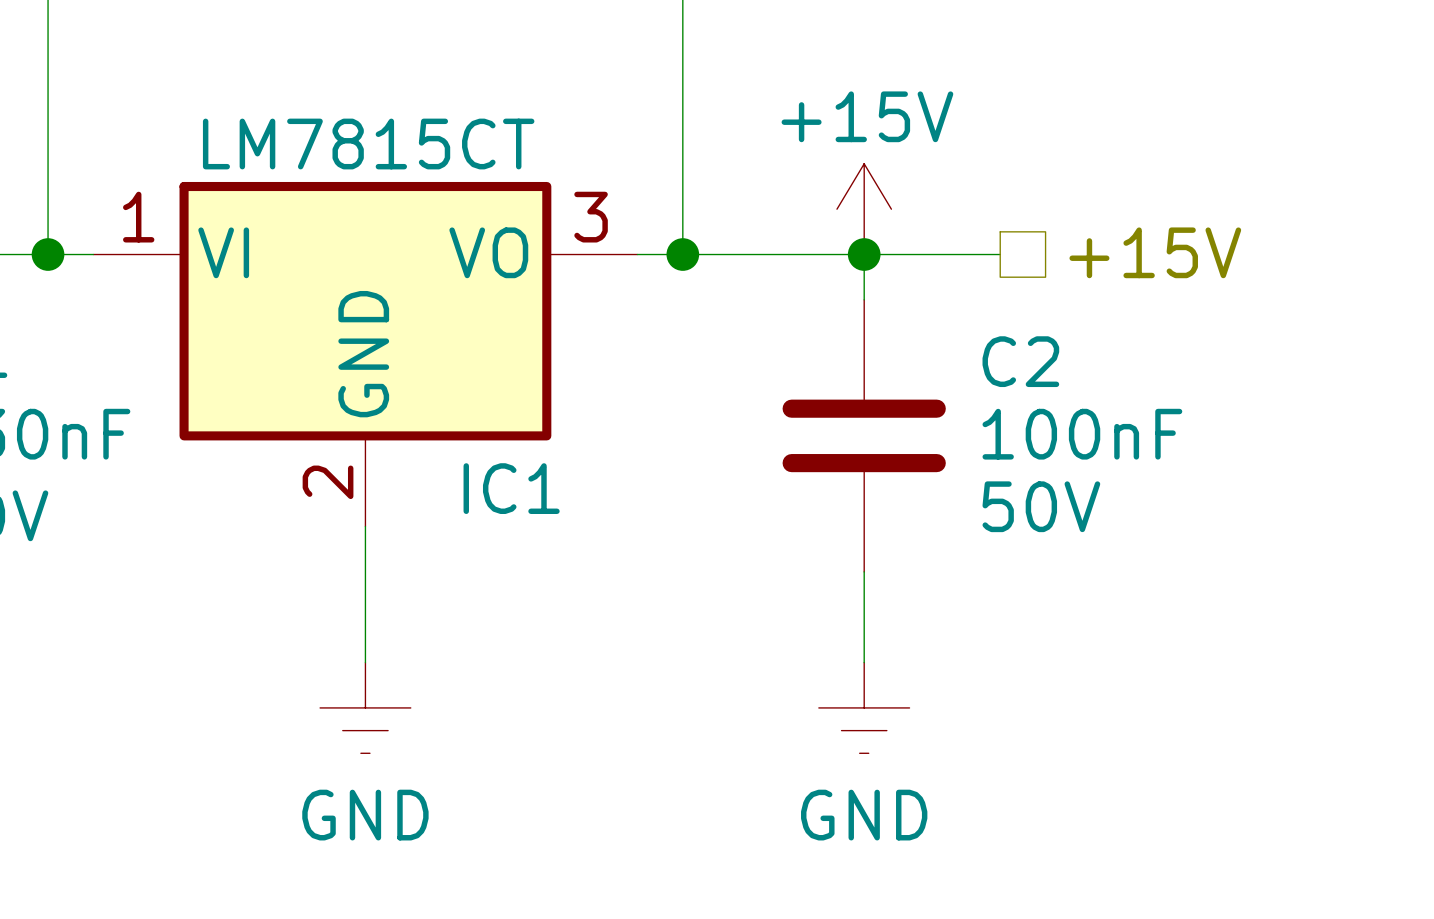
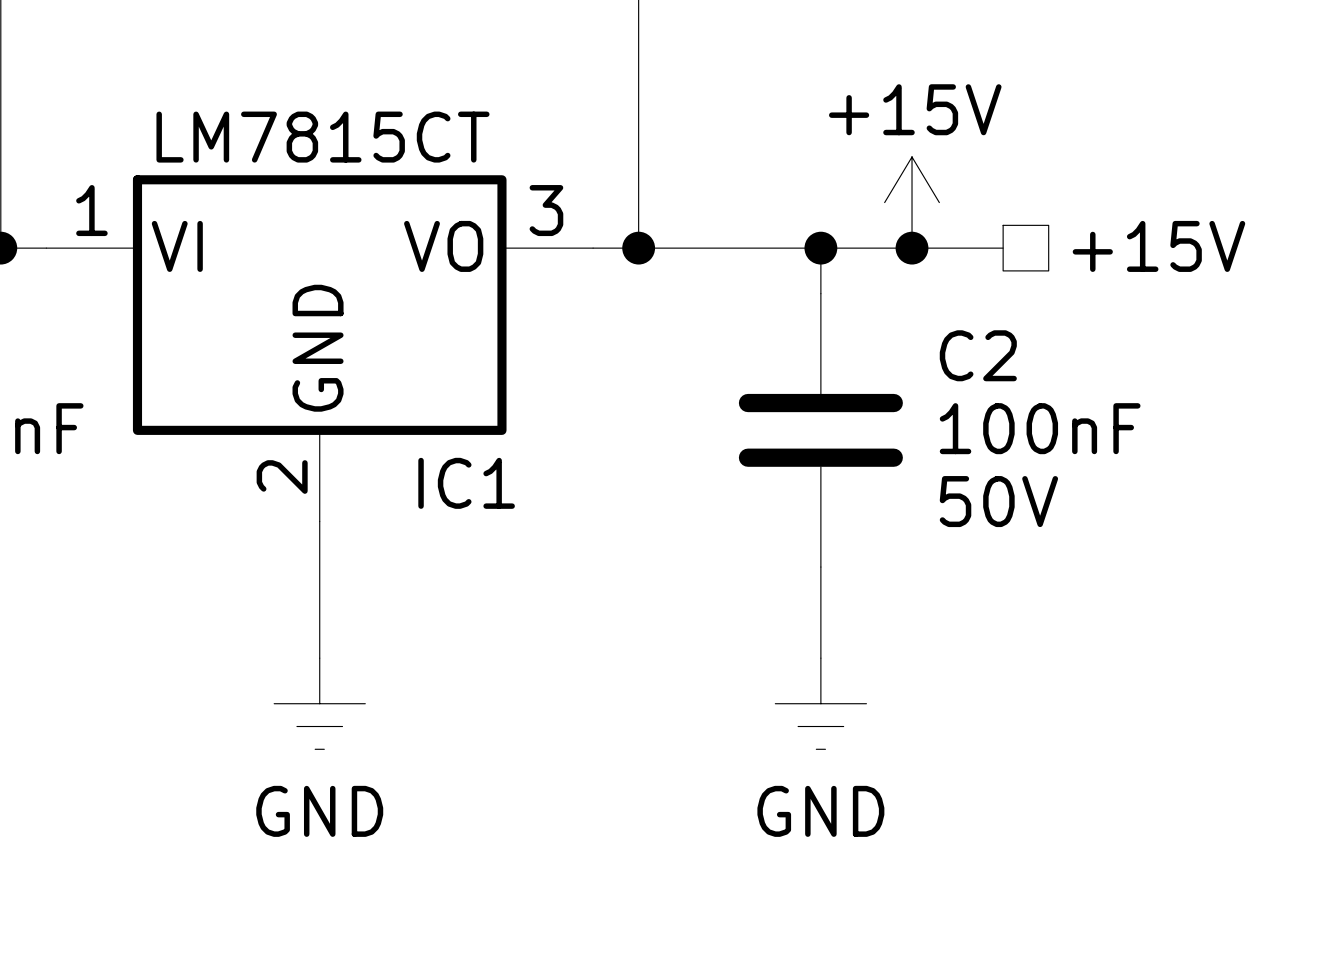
power symbol position: +15V (864, 209) -> +15V (912, 202)
hierarchical label position: +15V (1155, 252) -> +15V (1158, 246)
junction: none -> (912, 248)
wire: none -> (957, 248) (1003, 248)

